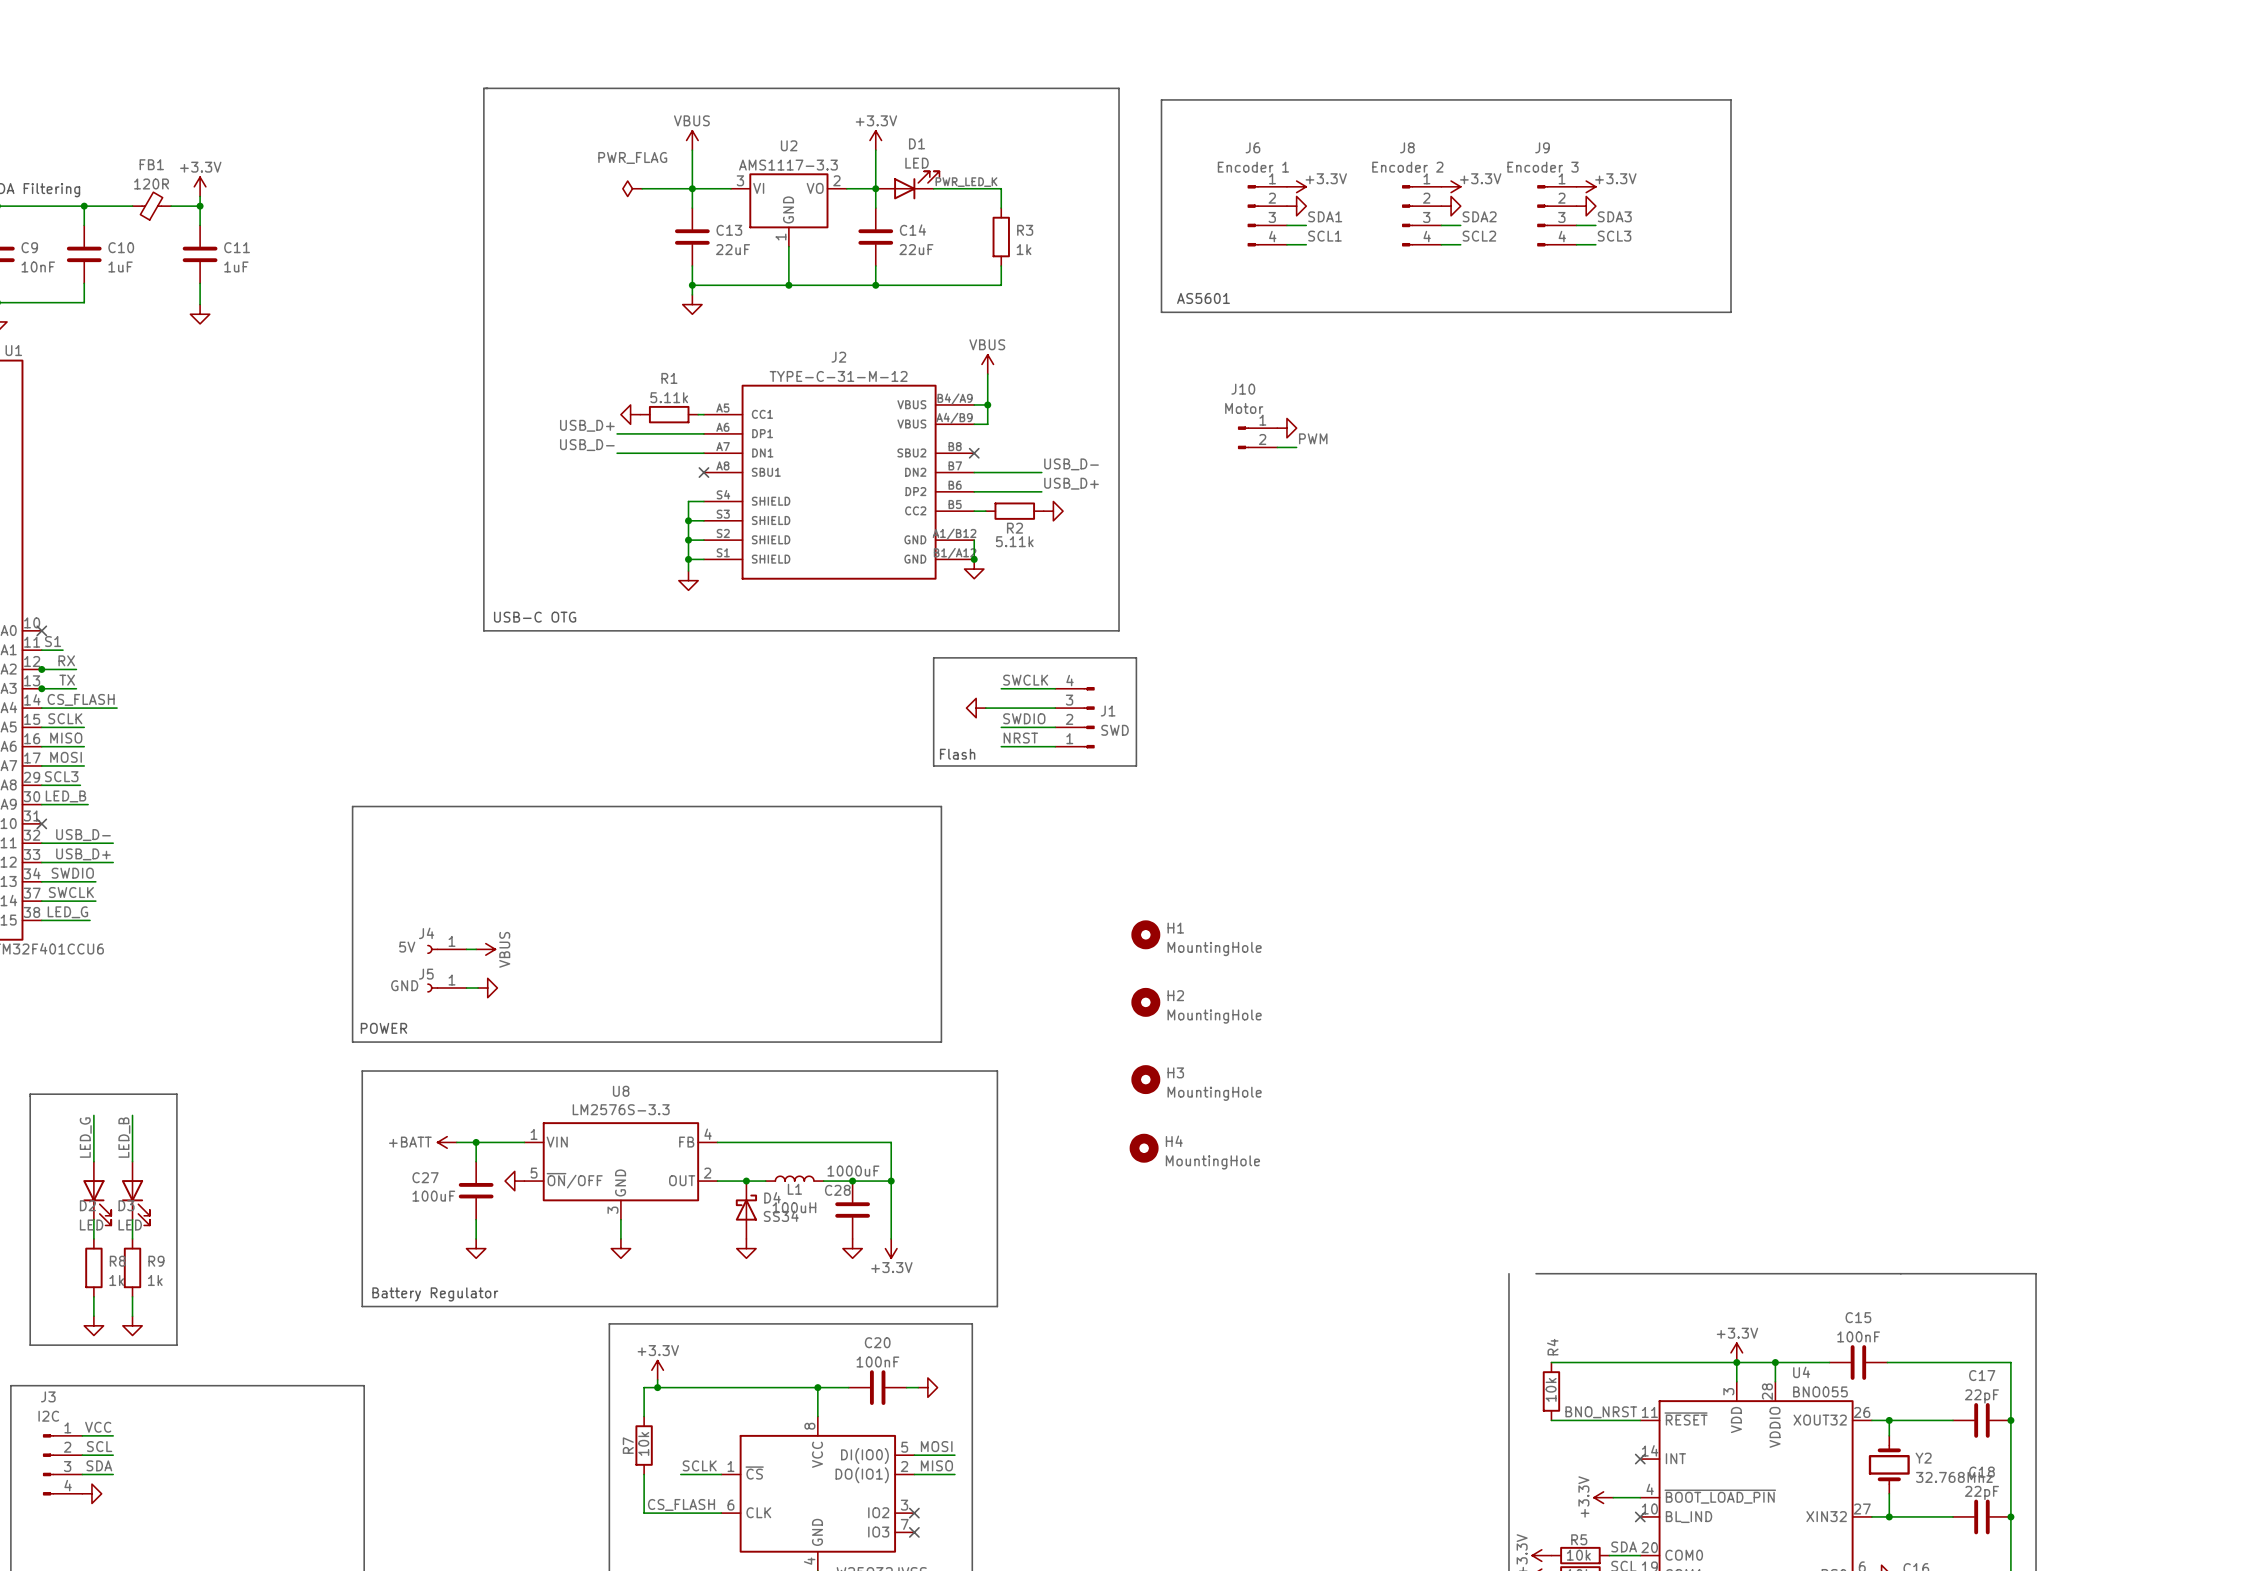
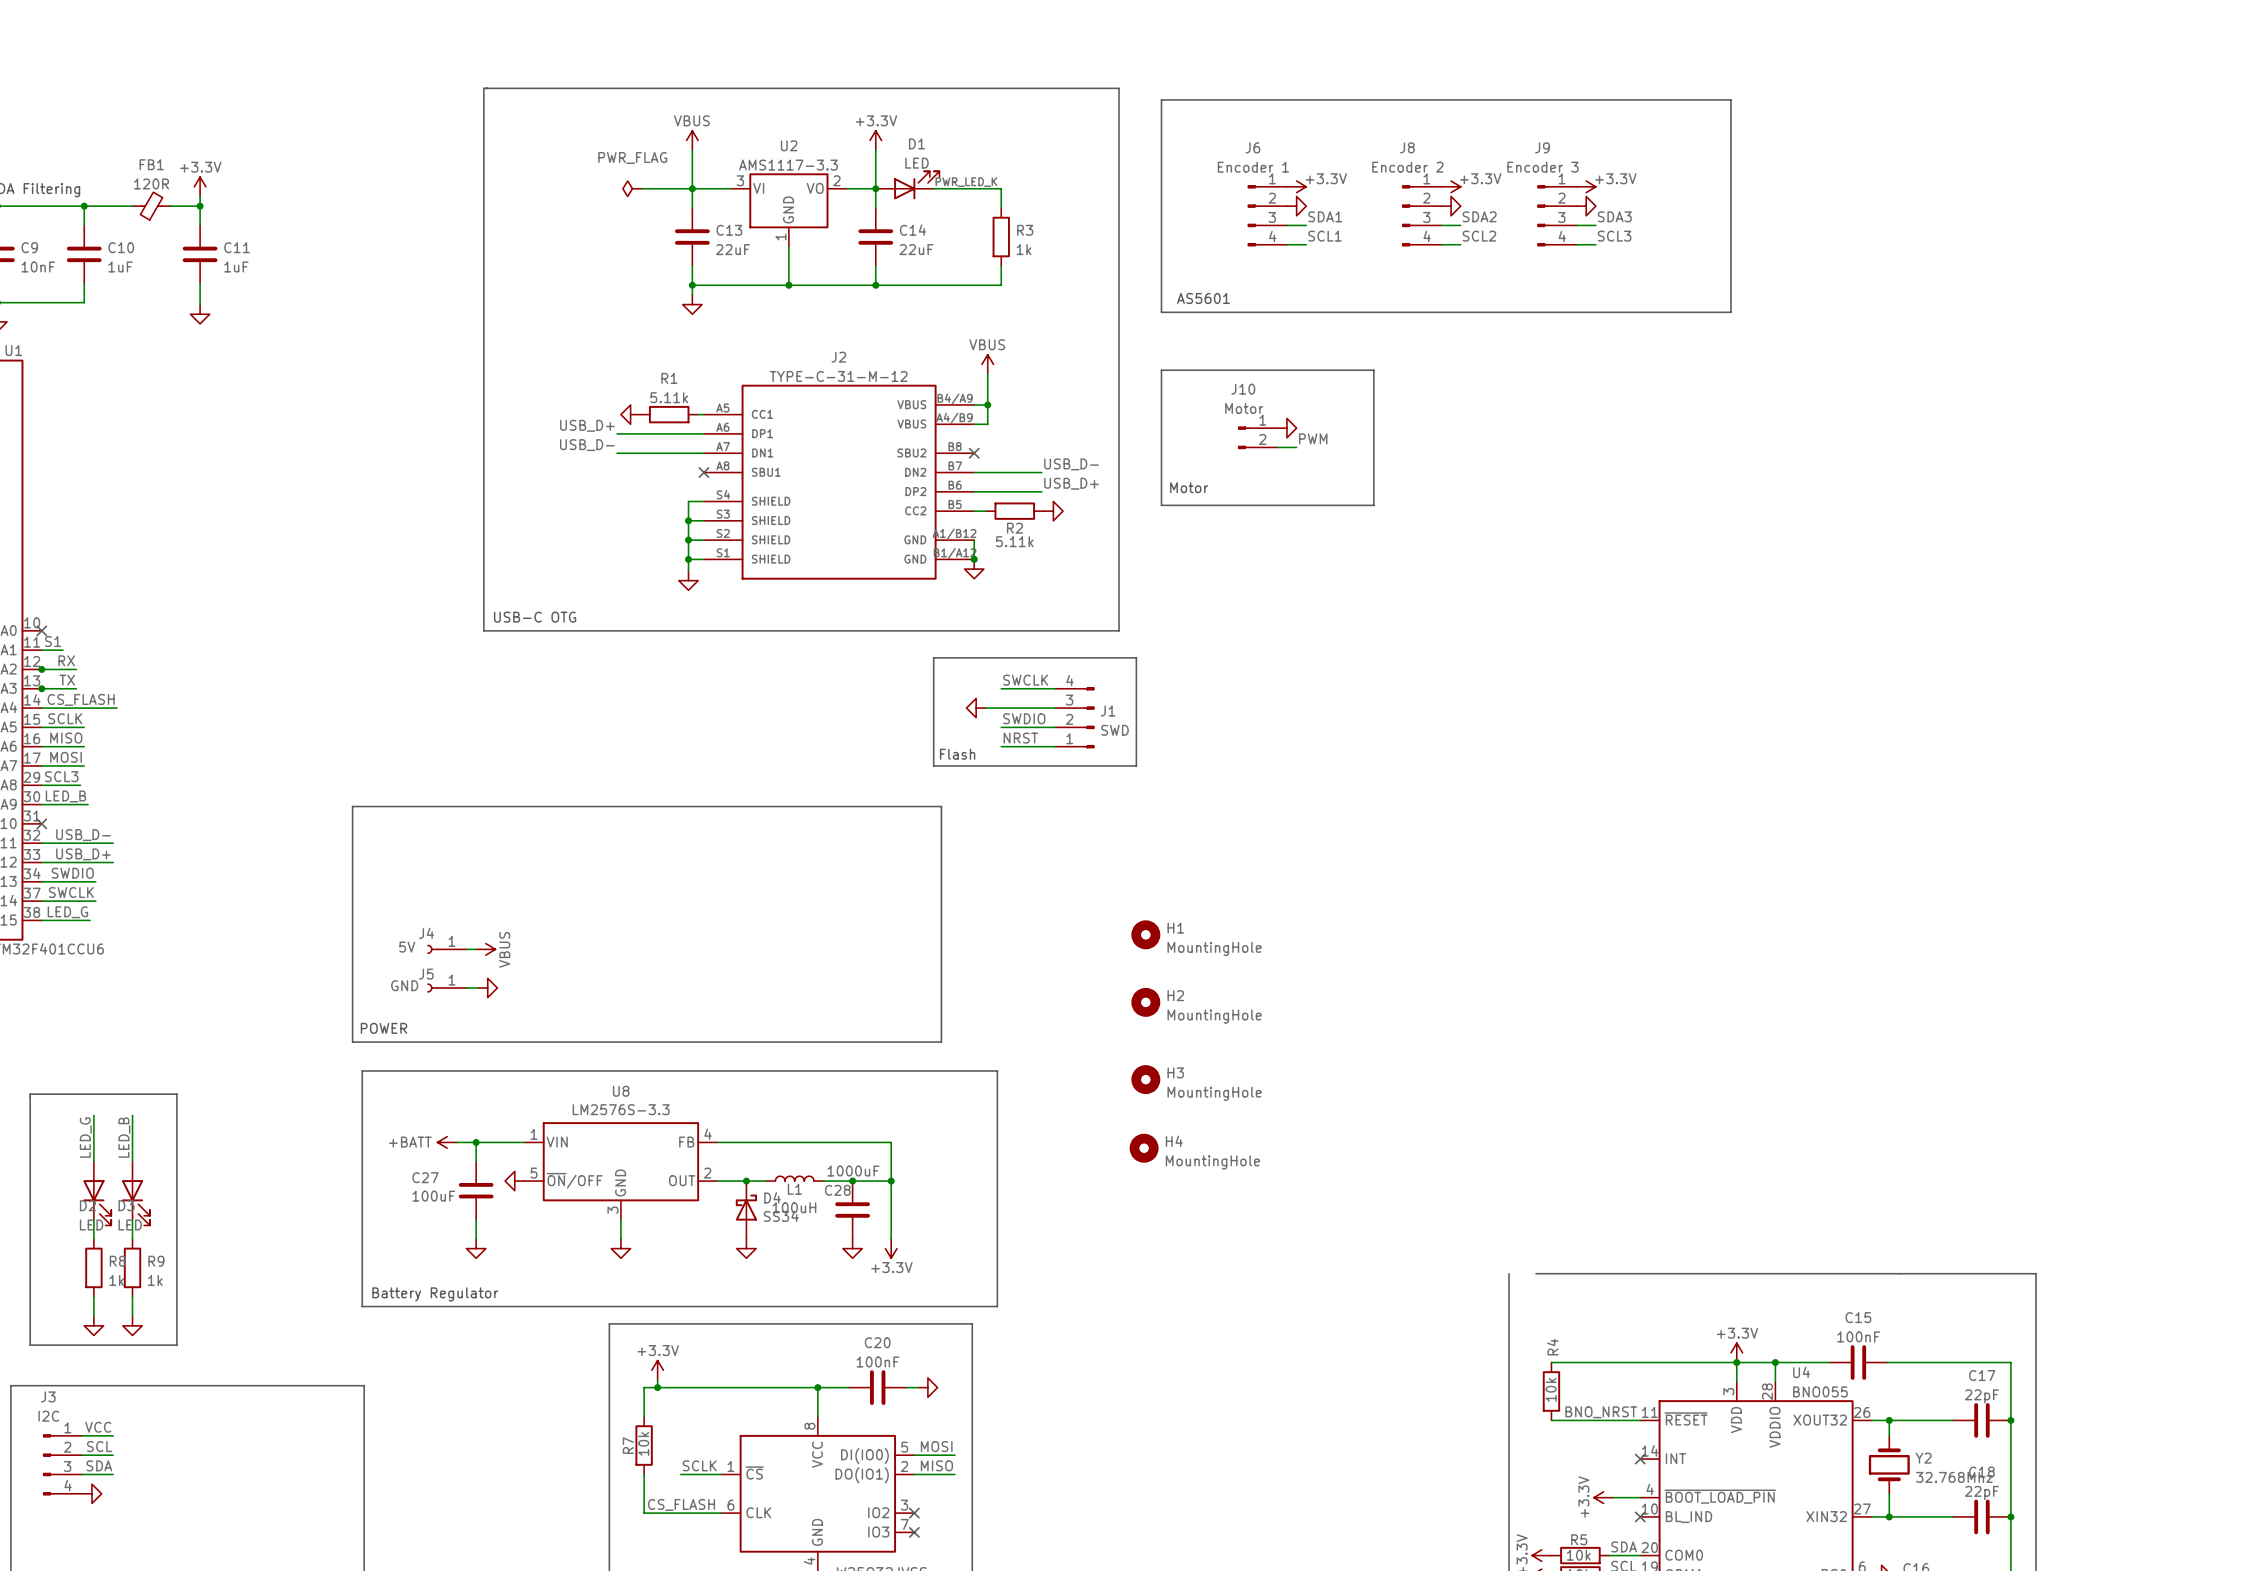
line: none -> (1161, 370) (1373, 370) (1373, 505) (1161, 505) (1161, 370)
text: none -> Motor (1189, 487)

